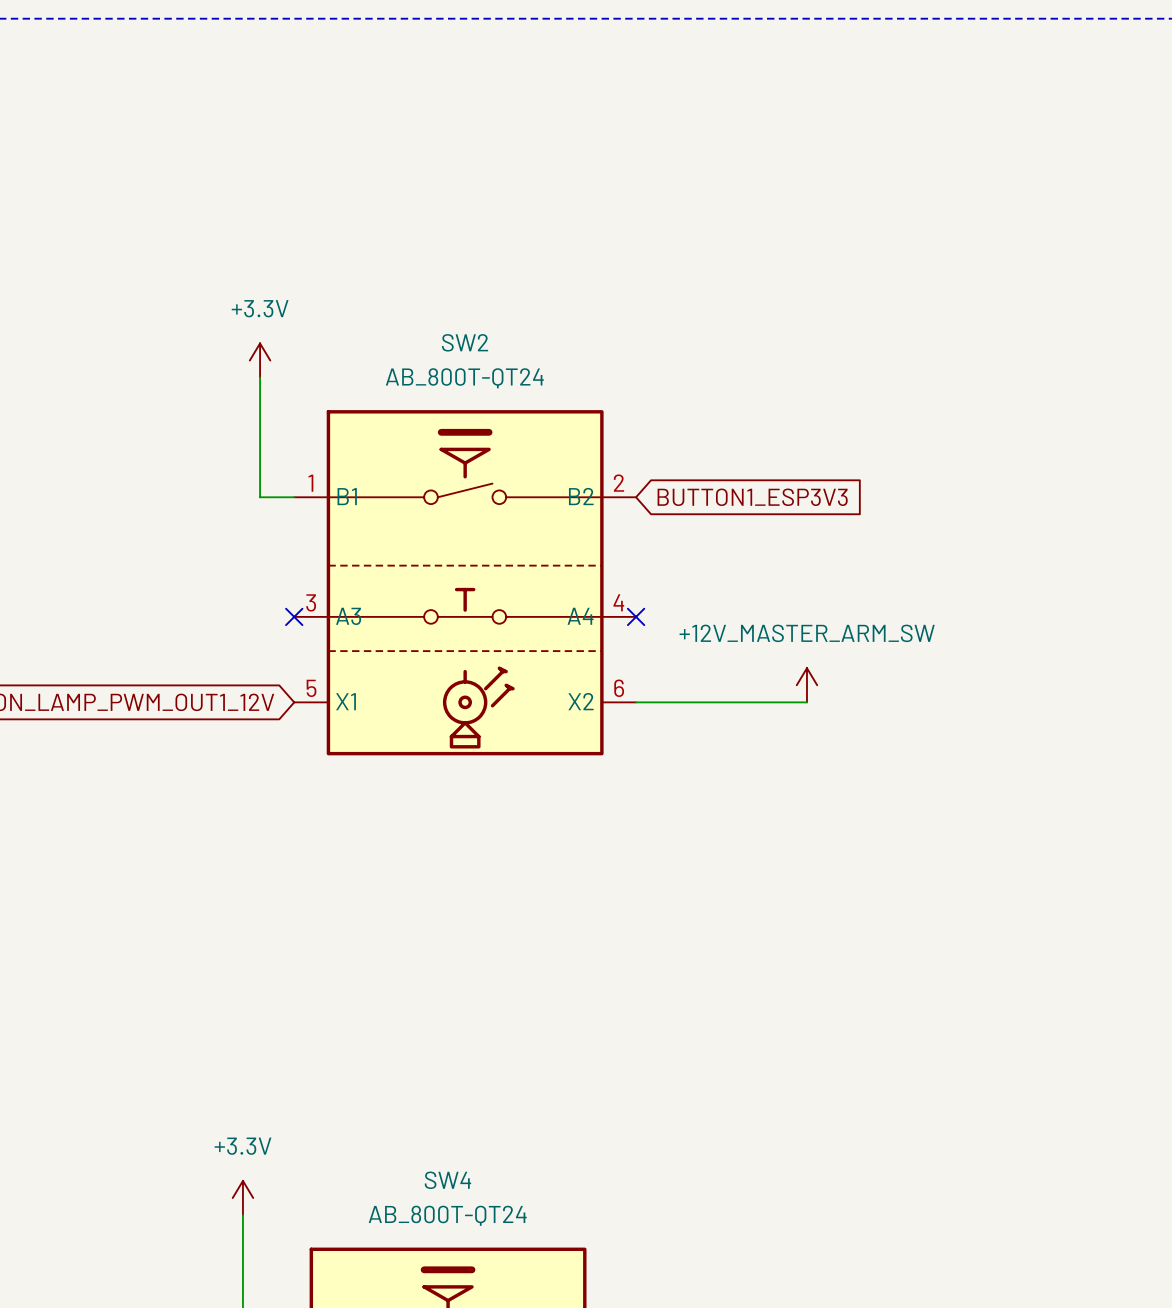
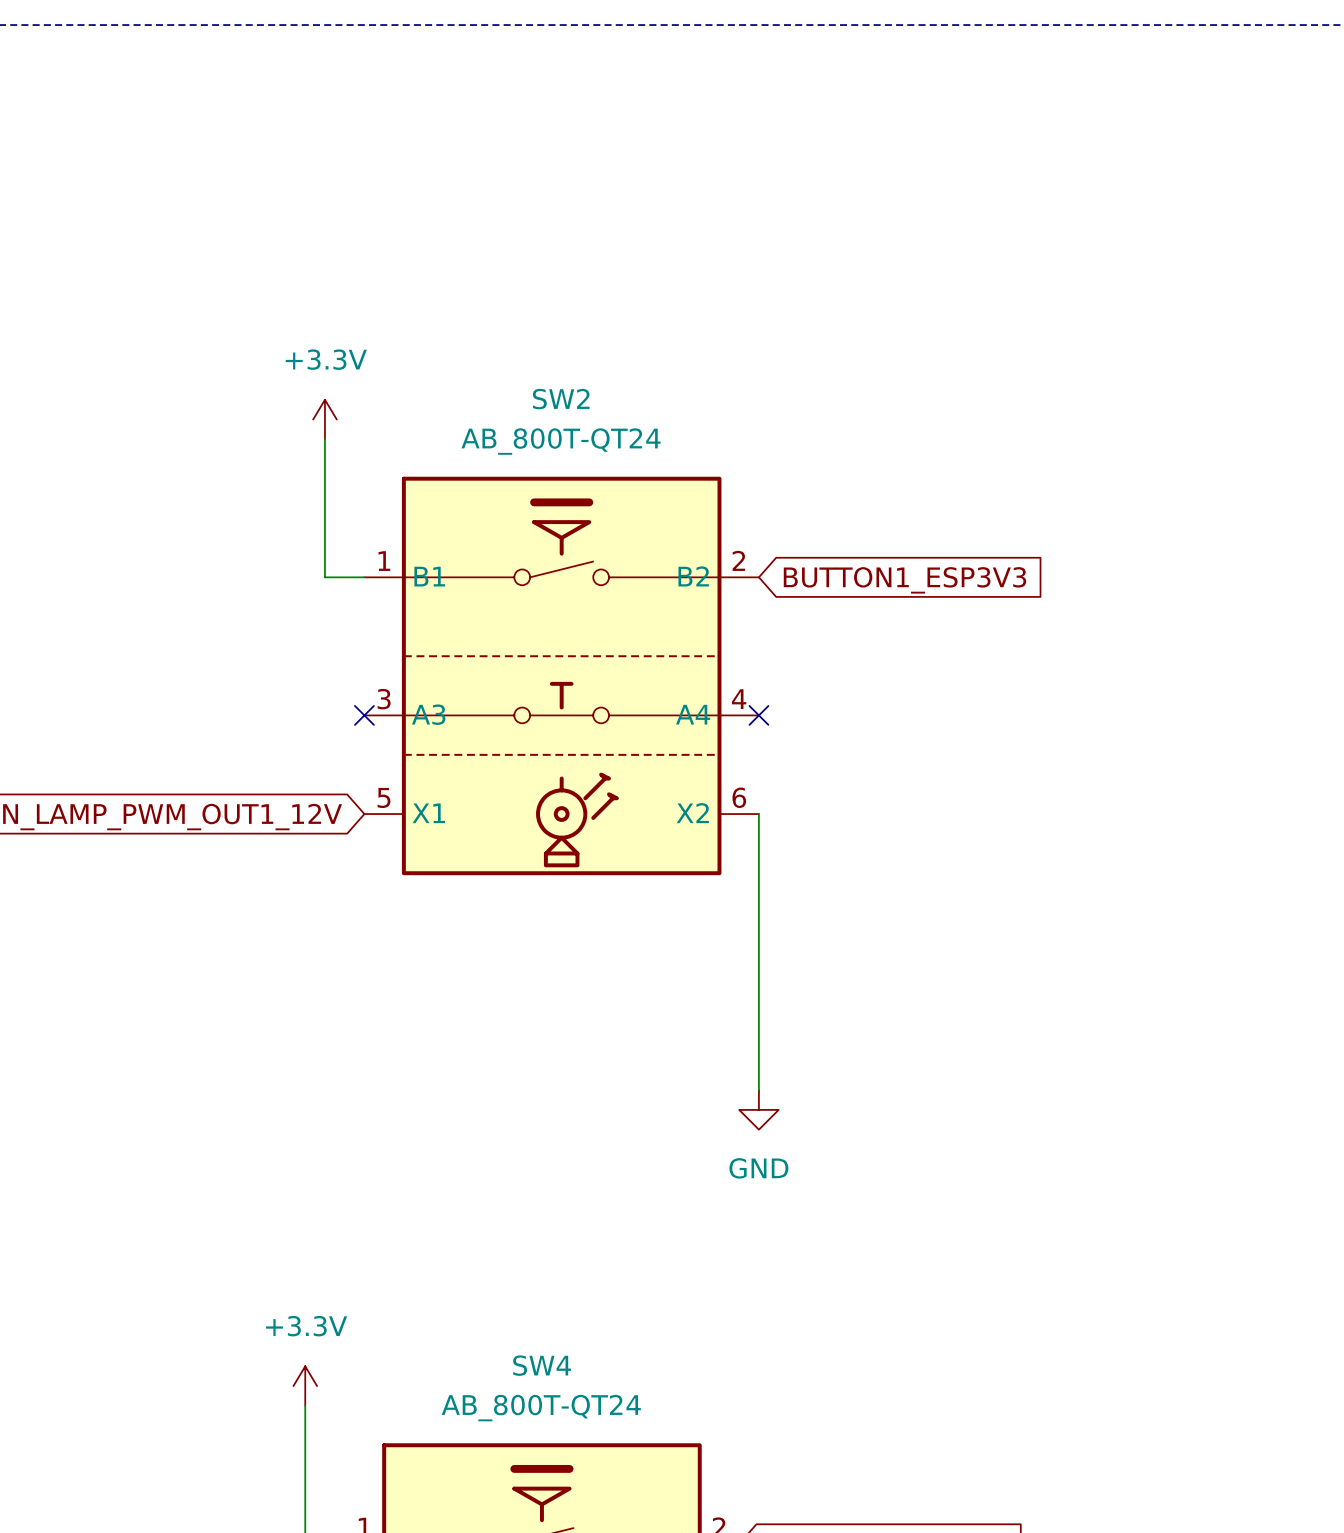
power symbol: +12V_MASTER_ARM_SW (806, 685) -> none
wire: (636, 702) (806, 702) -> (758, 814) (758, 1090)
power symbol: none -> GND (758, 1109)

